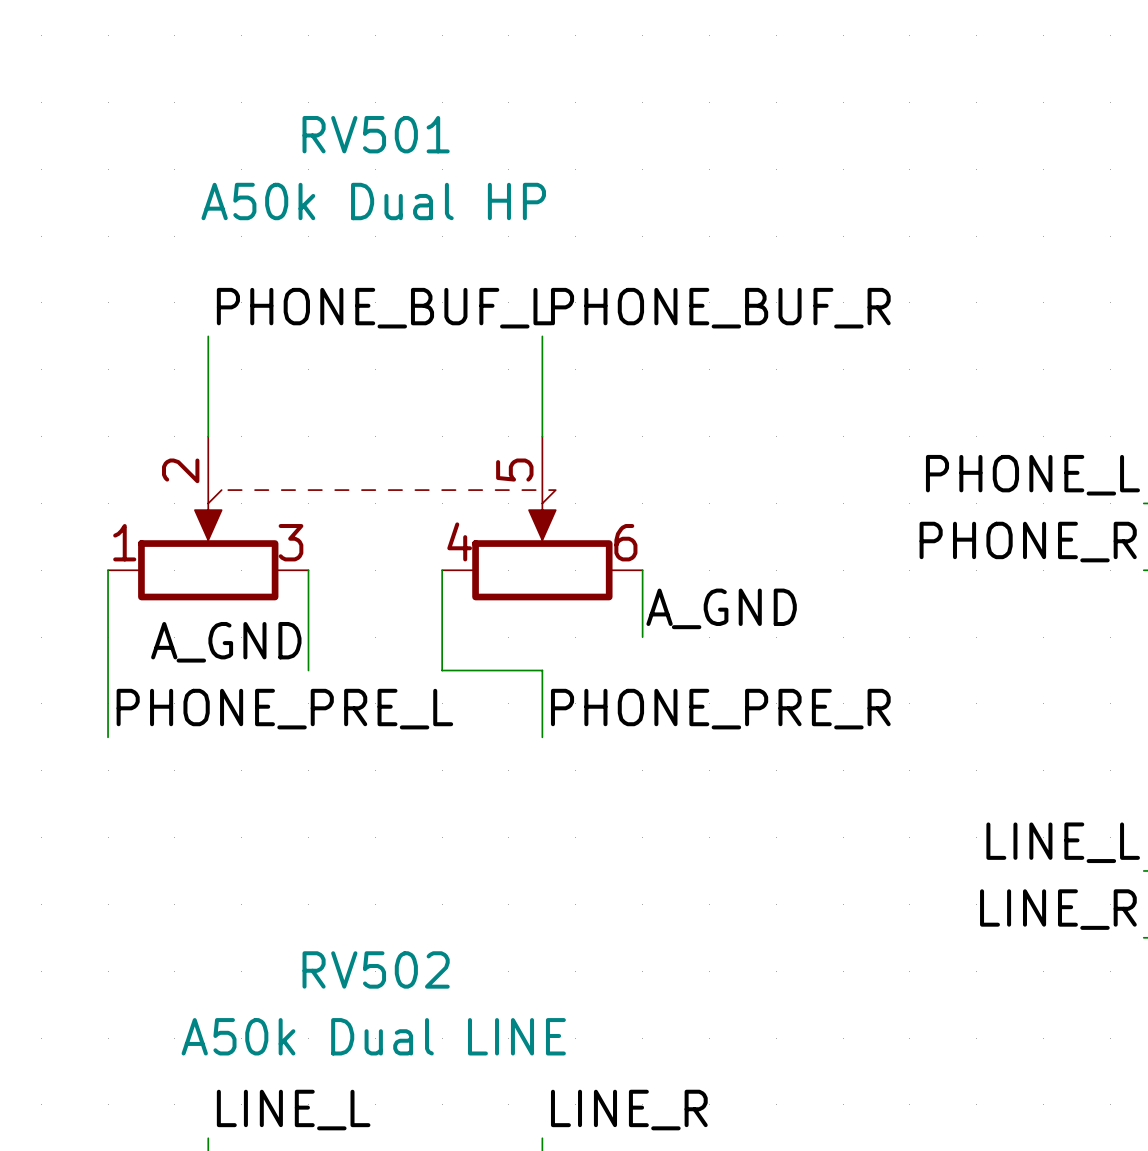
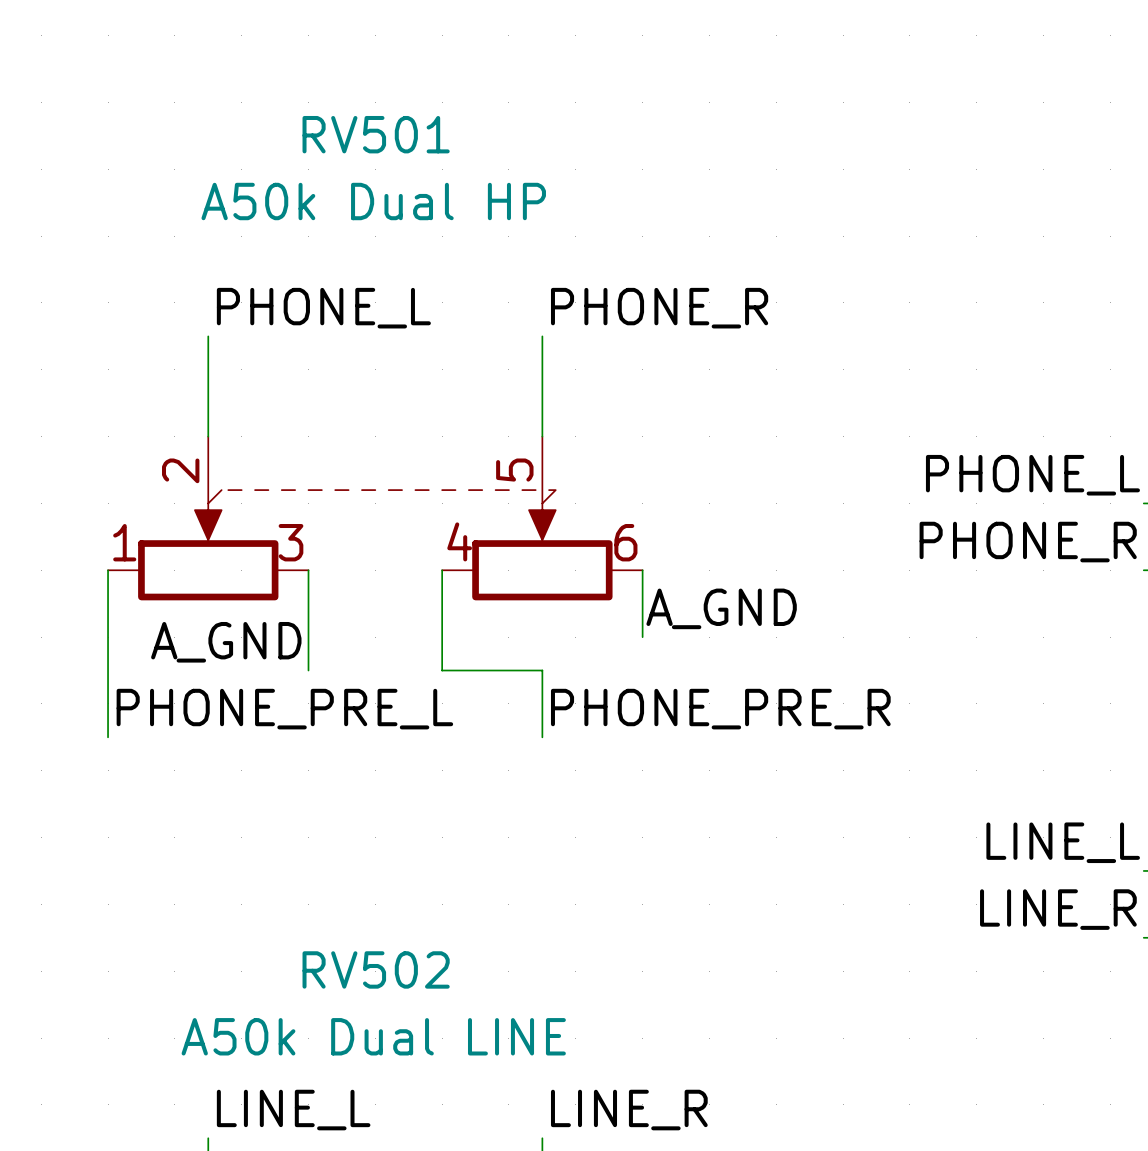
label: PHONE_BUF_L (385, 308) -> PHONE_L (323, 308)
label: PHONE_BUF_R (720, 308) -> PHONE_R (659, 308)

